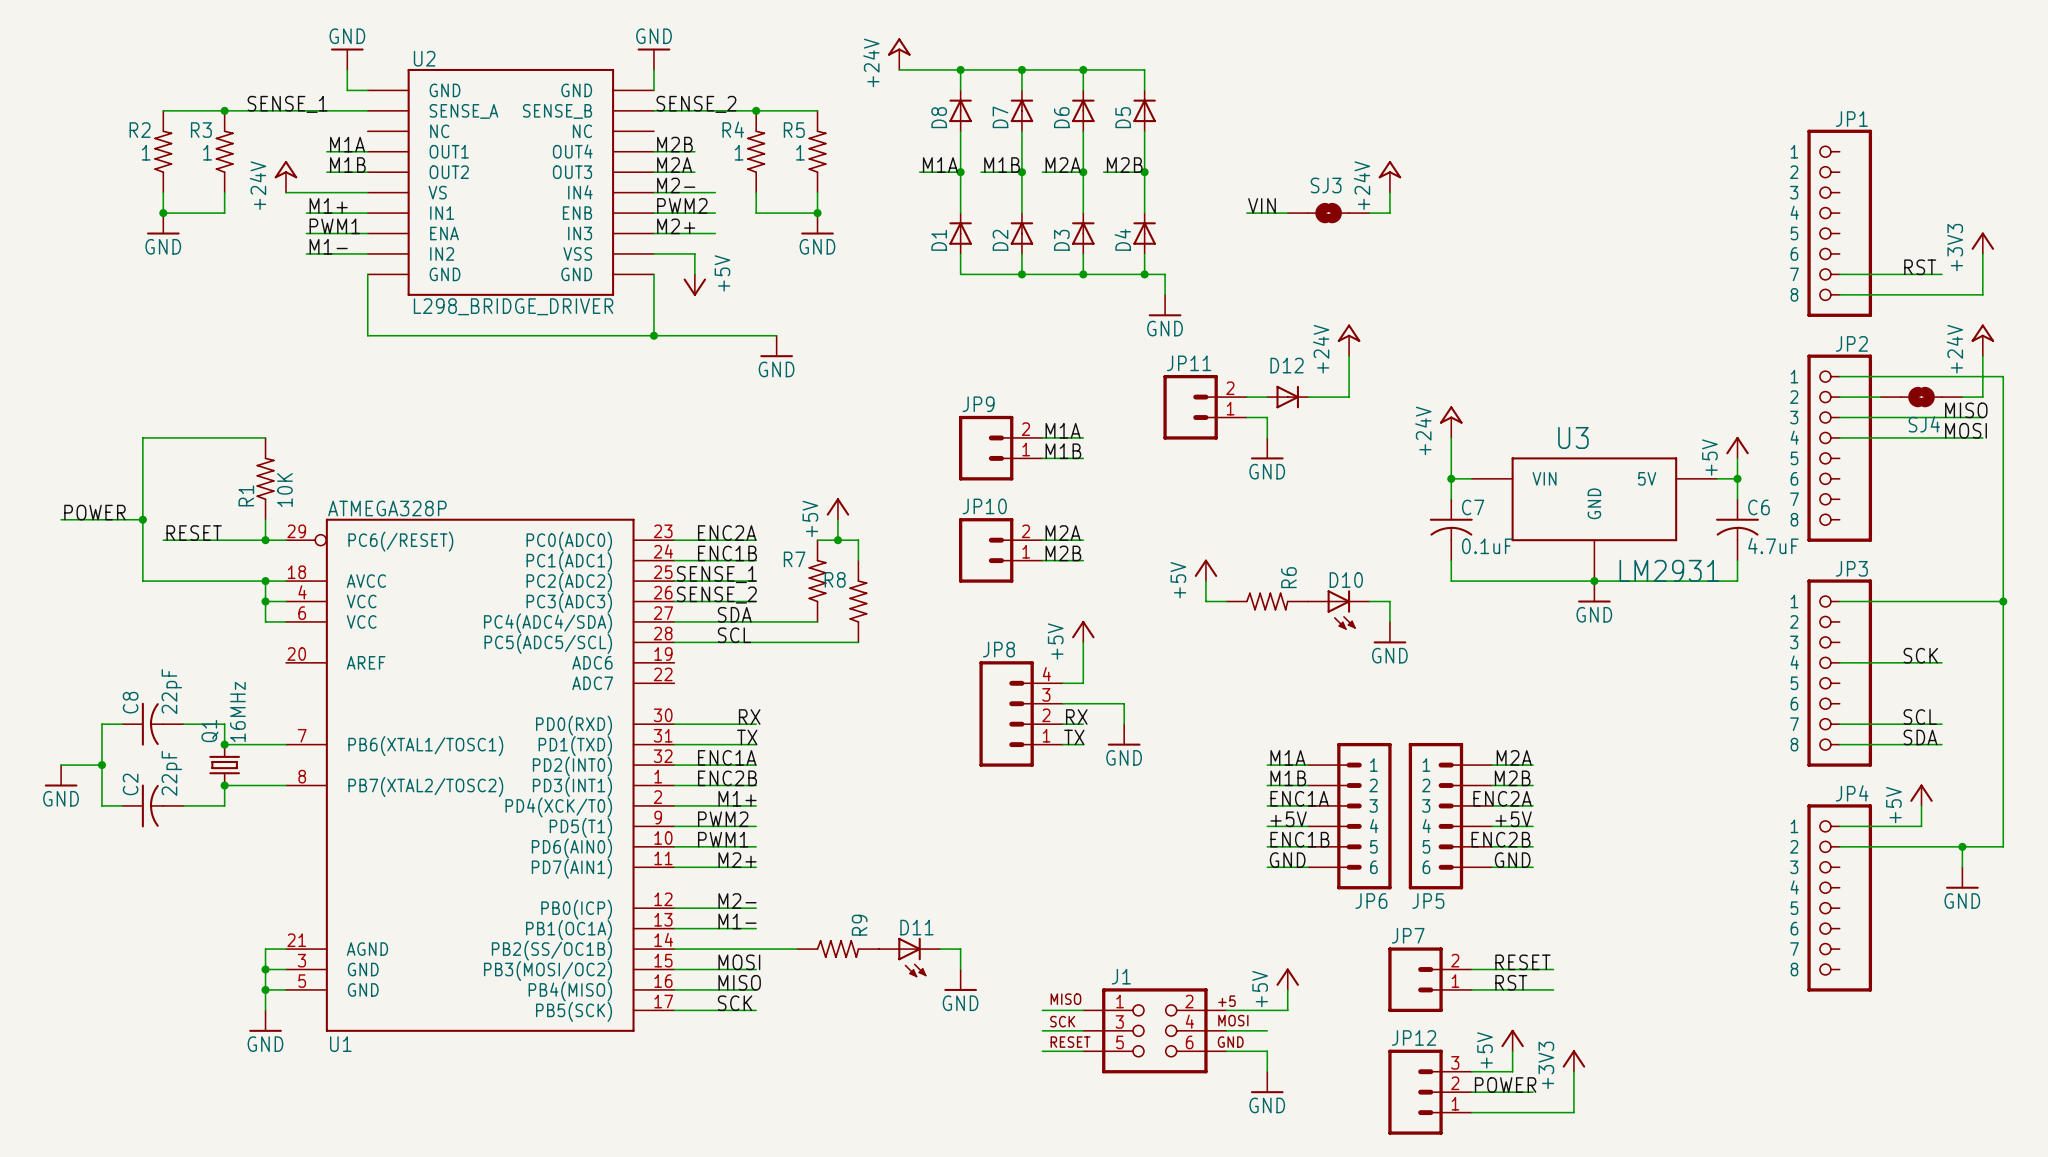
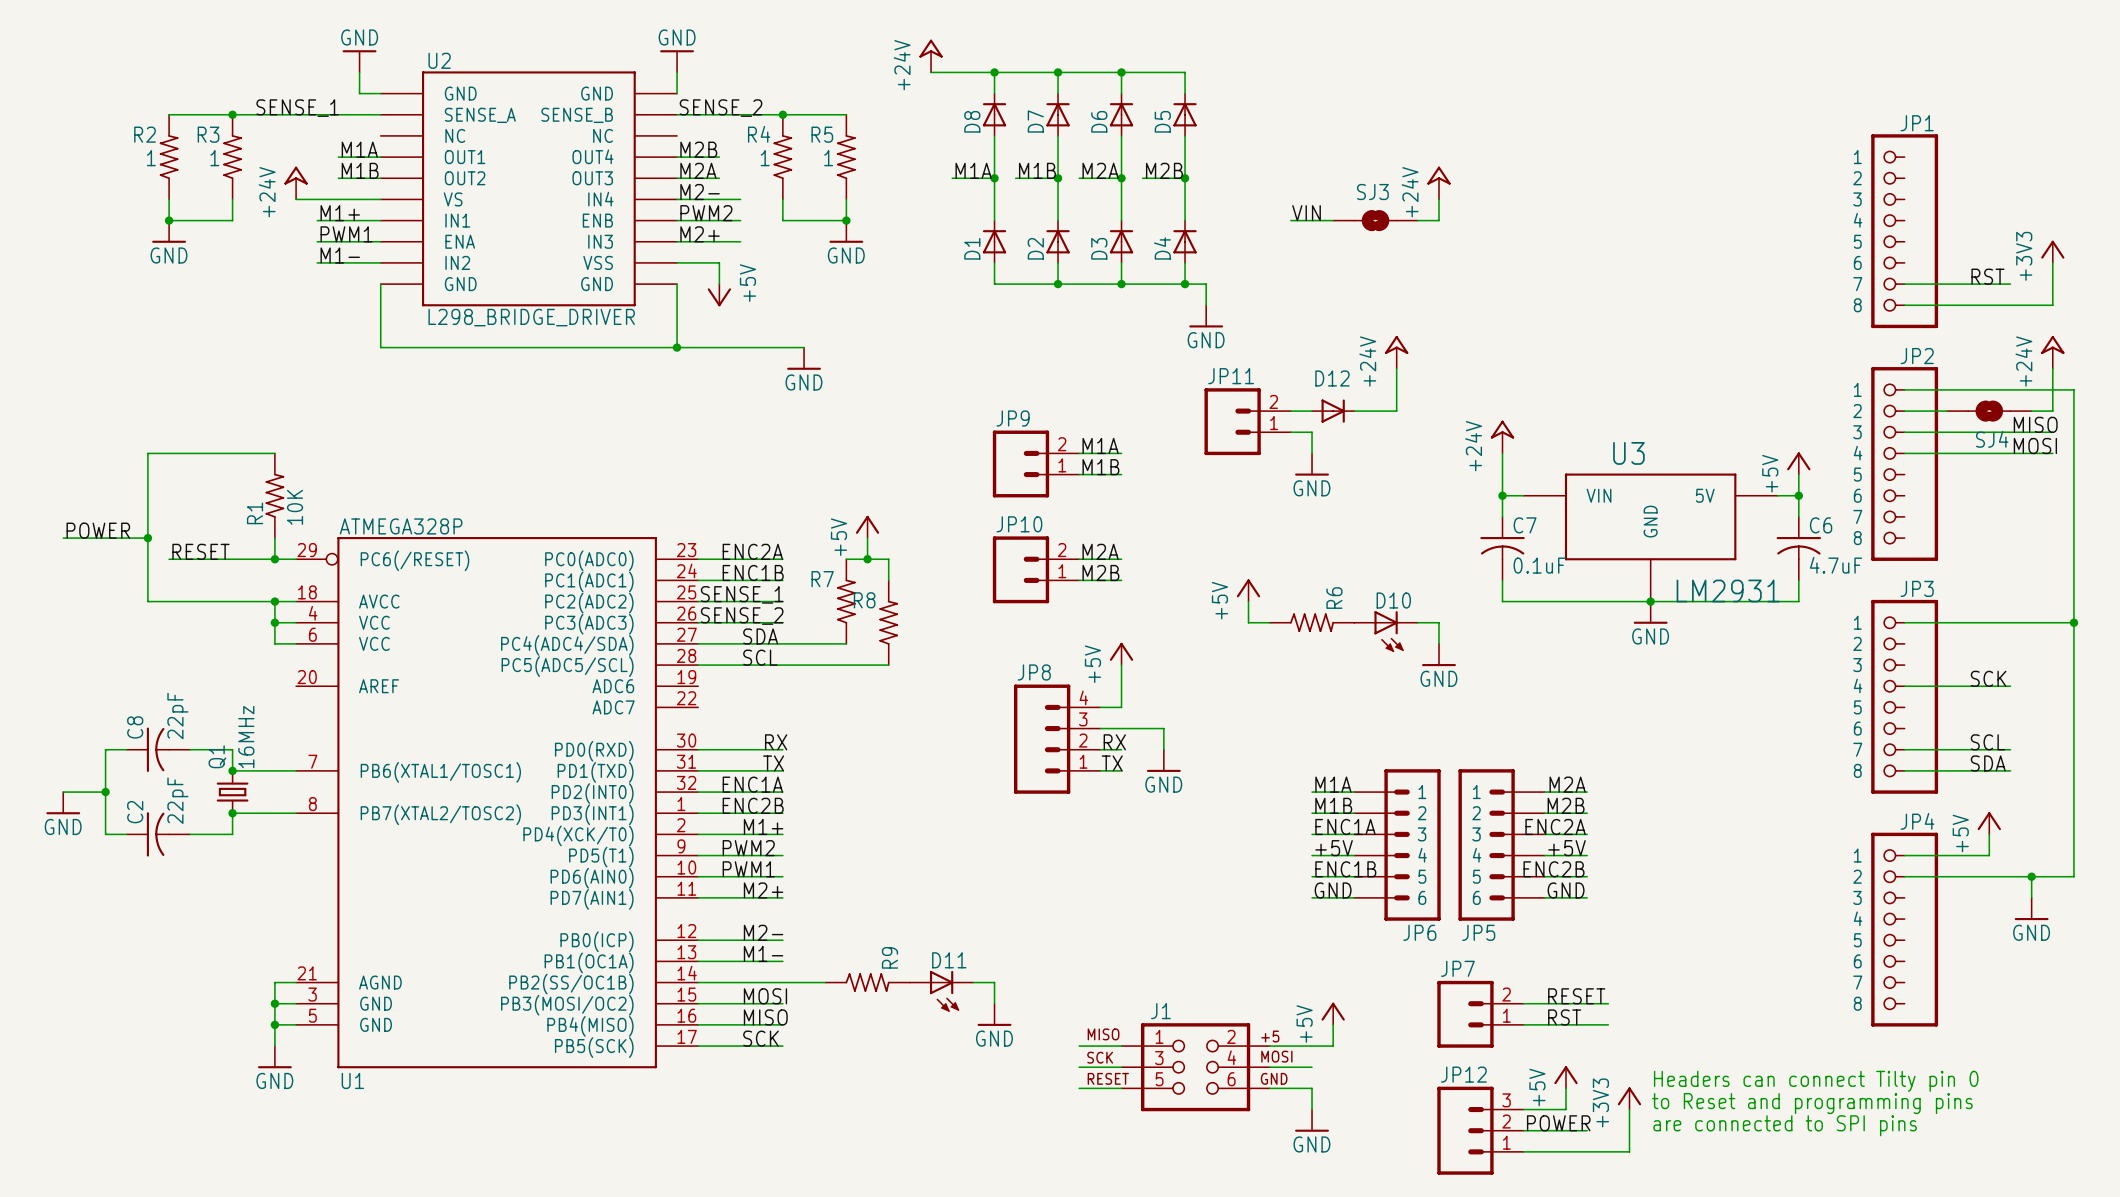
text: none -> Headers can connect Tilty pin 0 (1816, 1081)
text: none -> to Reset and programming pins (1812, 1103)
text: none -> are connected to SPI pins (1785, 1125)

